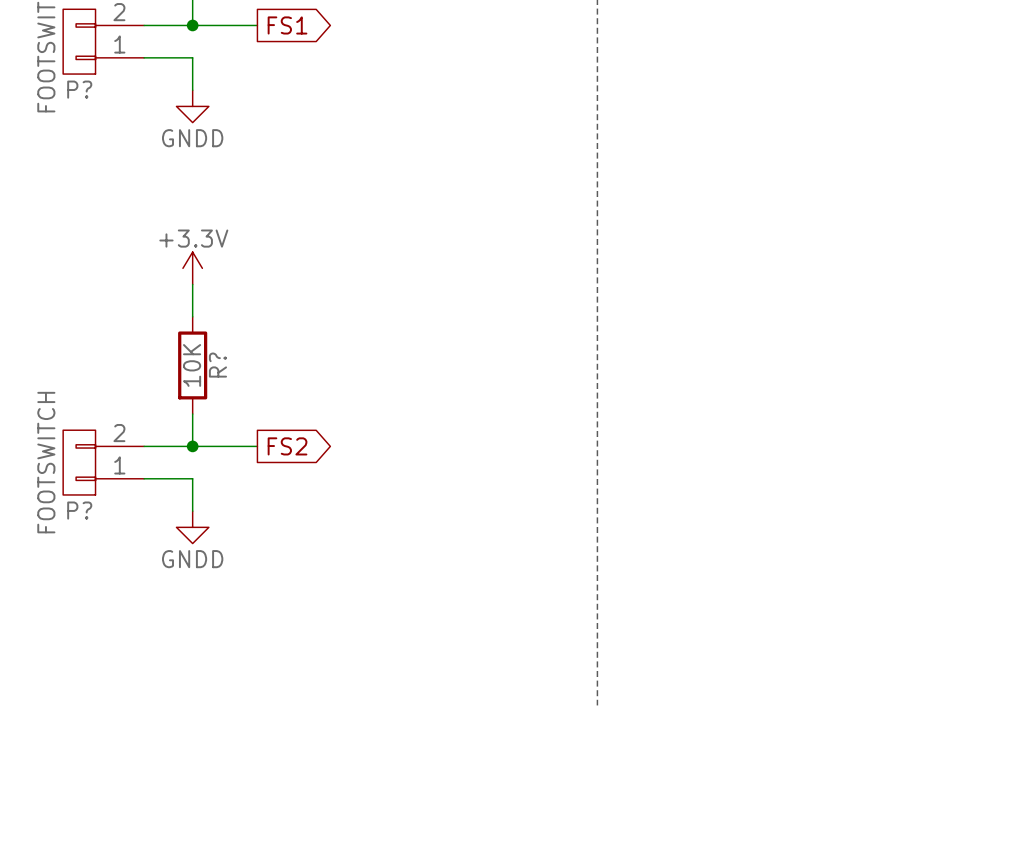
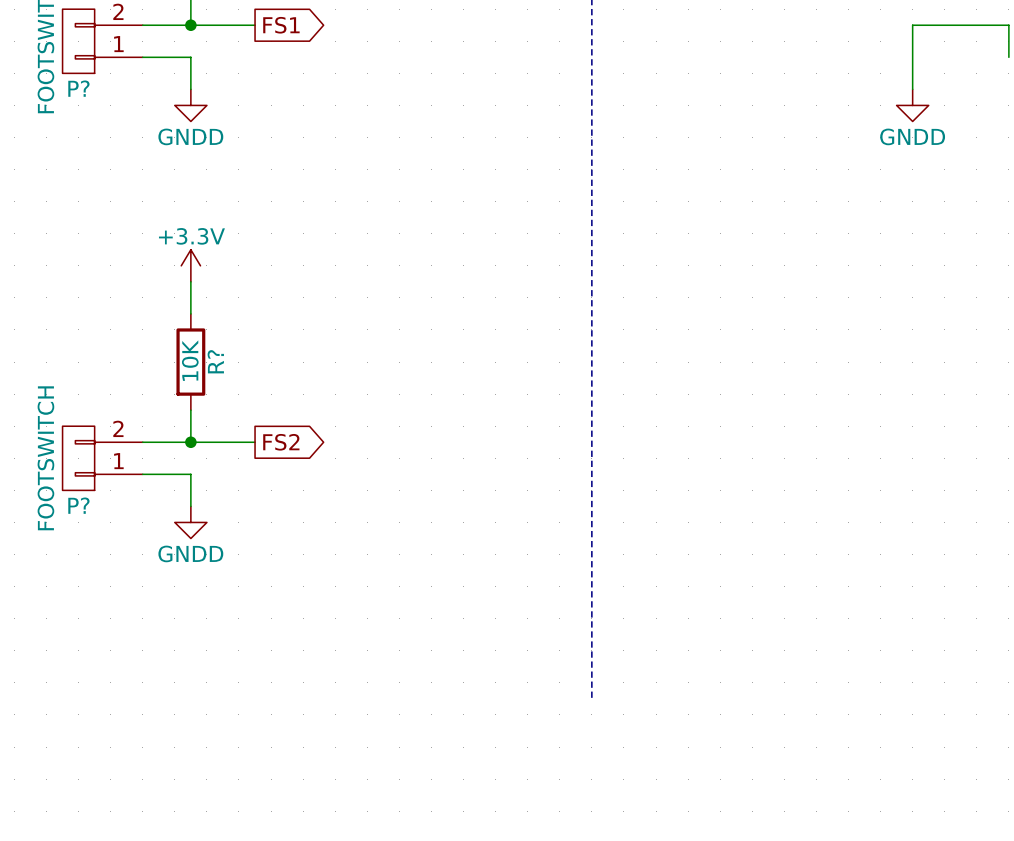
wire: none -> (1008, 57) (1008, 25) (912, 25) (912, 89)
power symbol: none -> GNDD (912, 105)

